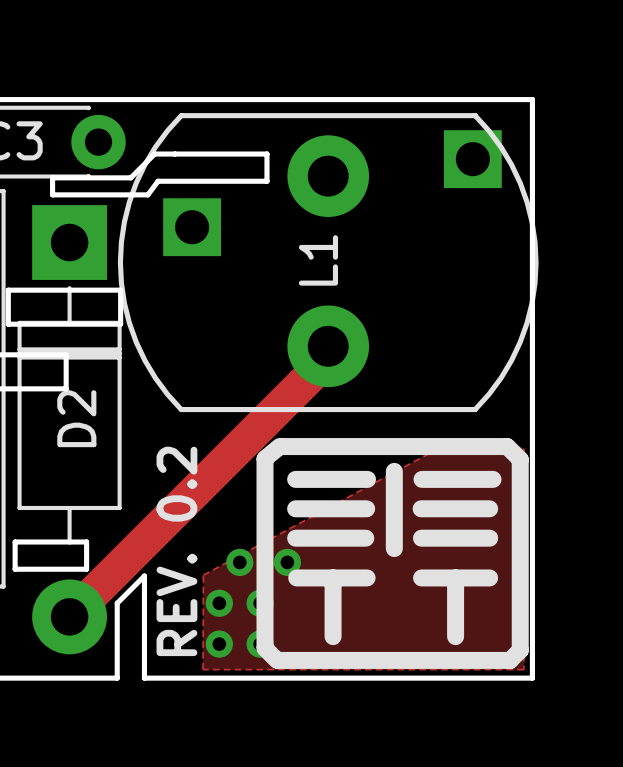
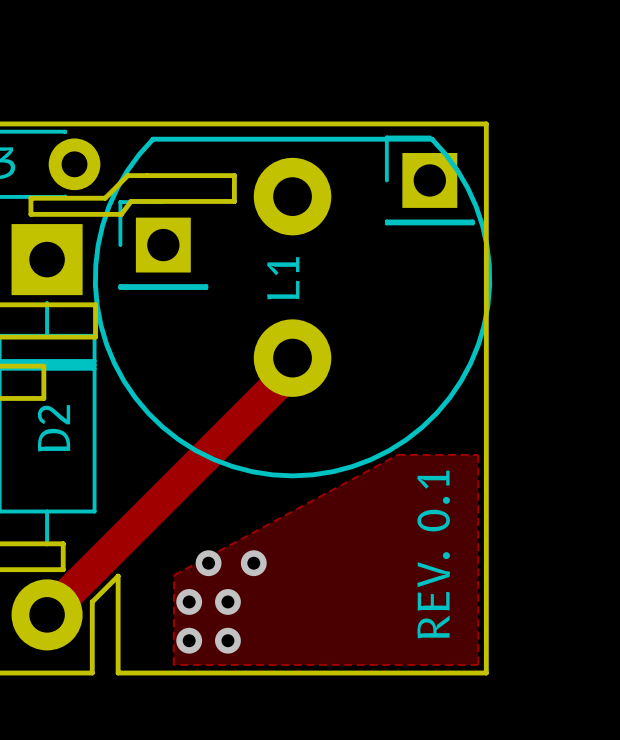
L1 footprint: [117, 113, 539, 413] -> [93, 136, 493, 479]
part footprint: [443, 130, 502, 189] -> [384, 135, 475, 226]
part footprint: [163, 198, 222, 257] -> [118, 200, 209, 290]
drawing: [256, 438, 529, 670] -> none
text: REV. 0.2 (176, 551) -> none
text: none -> REV. 0.1 (433, 554)

